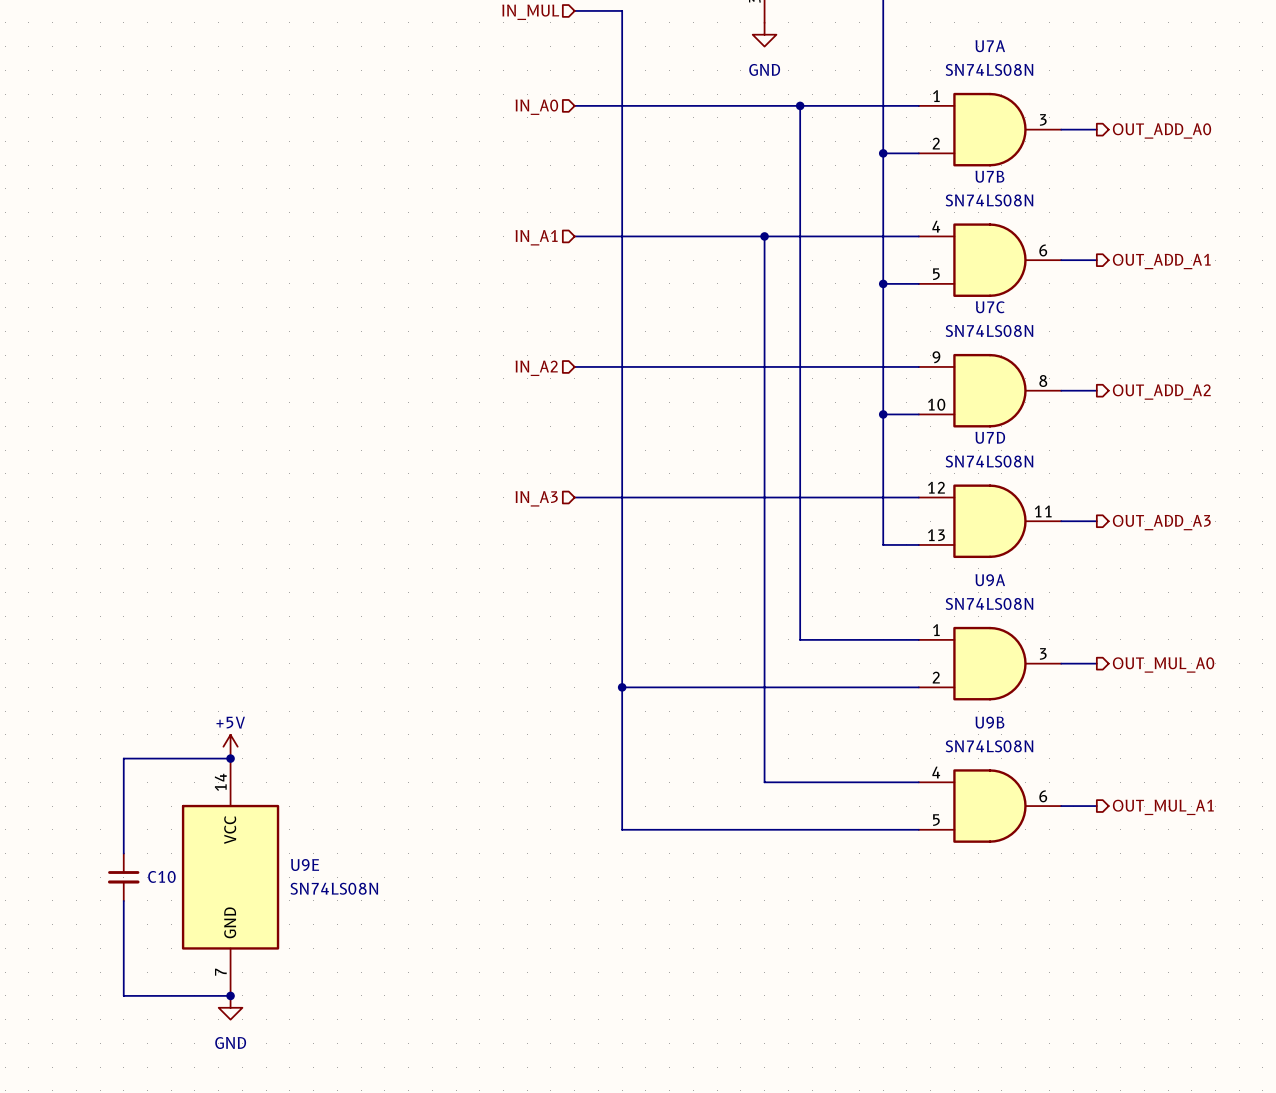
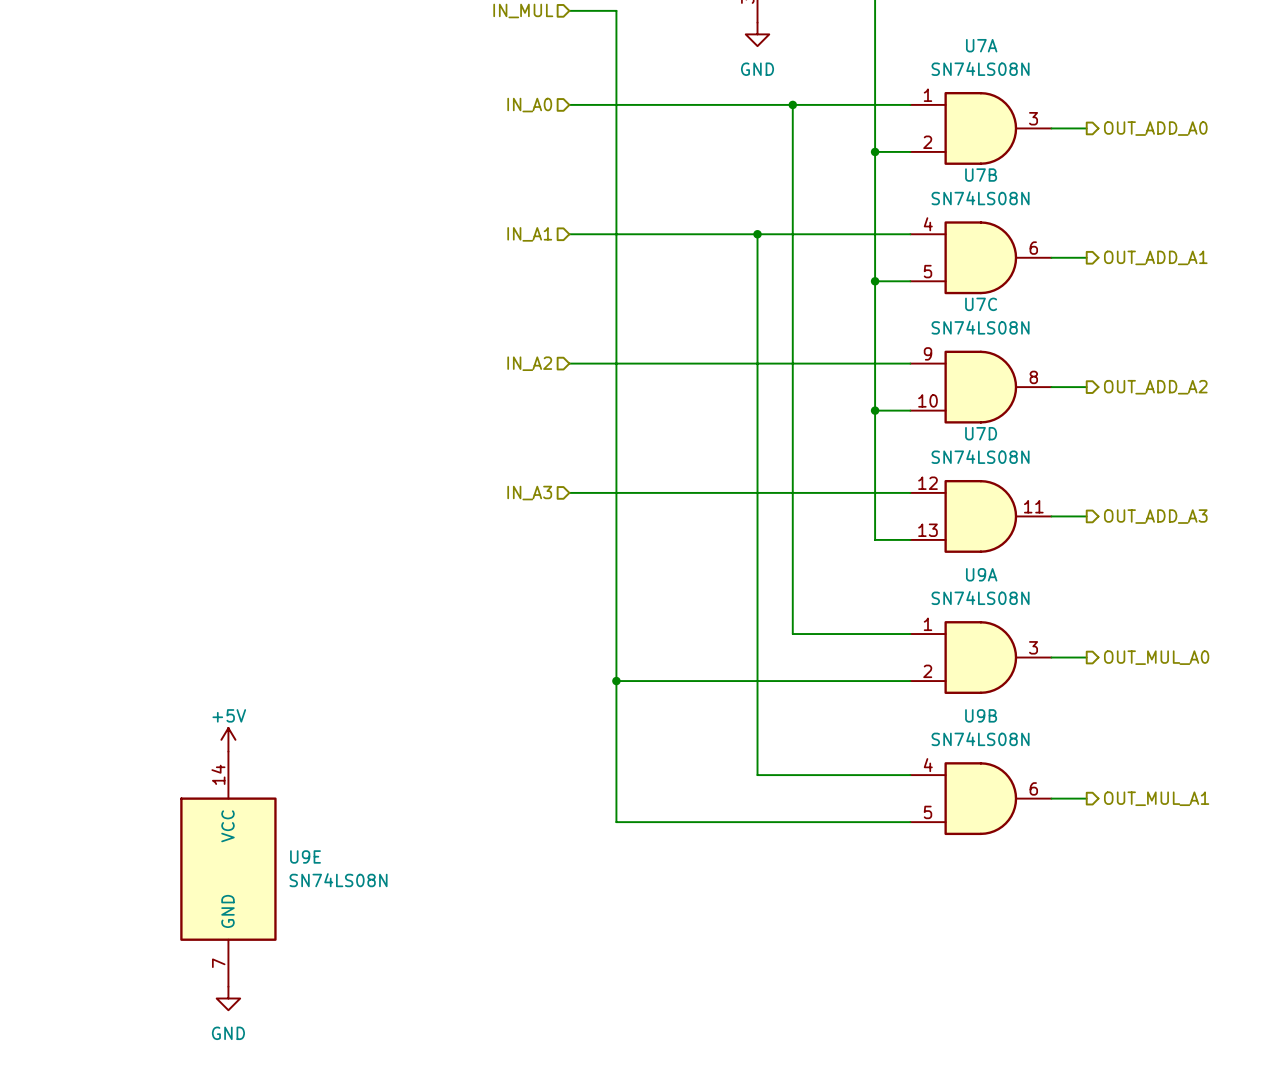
wire: (230, 758) (123, 758) (123, 853) -> none
junction: (230, 758) -> none
C10: (123, 877) -> none
wire: (123, 900) (123, 995) (230, 995) -> none
junction: (230, 995) -> none

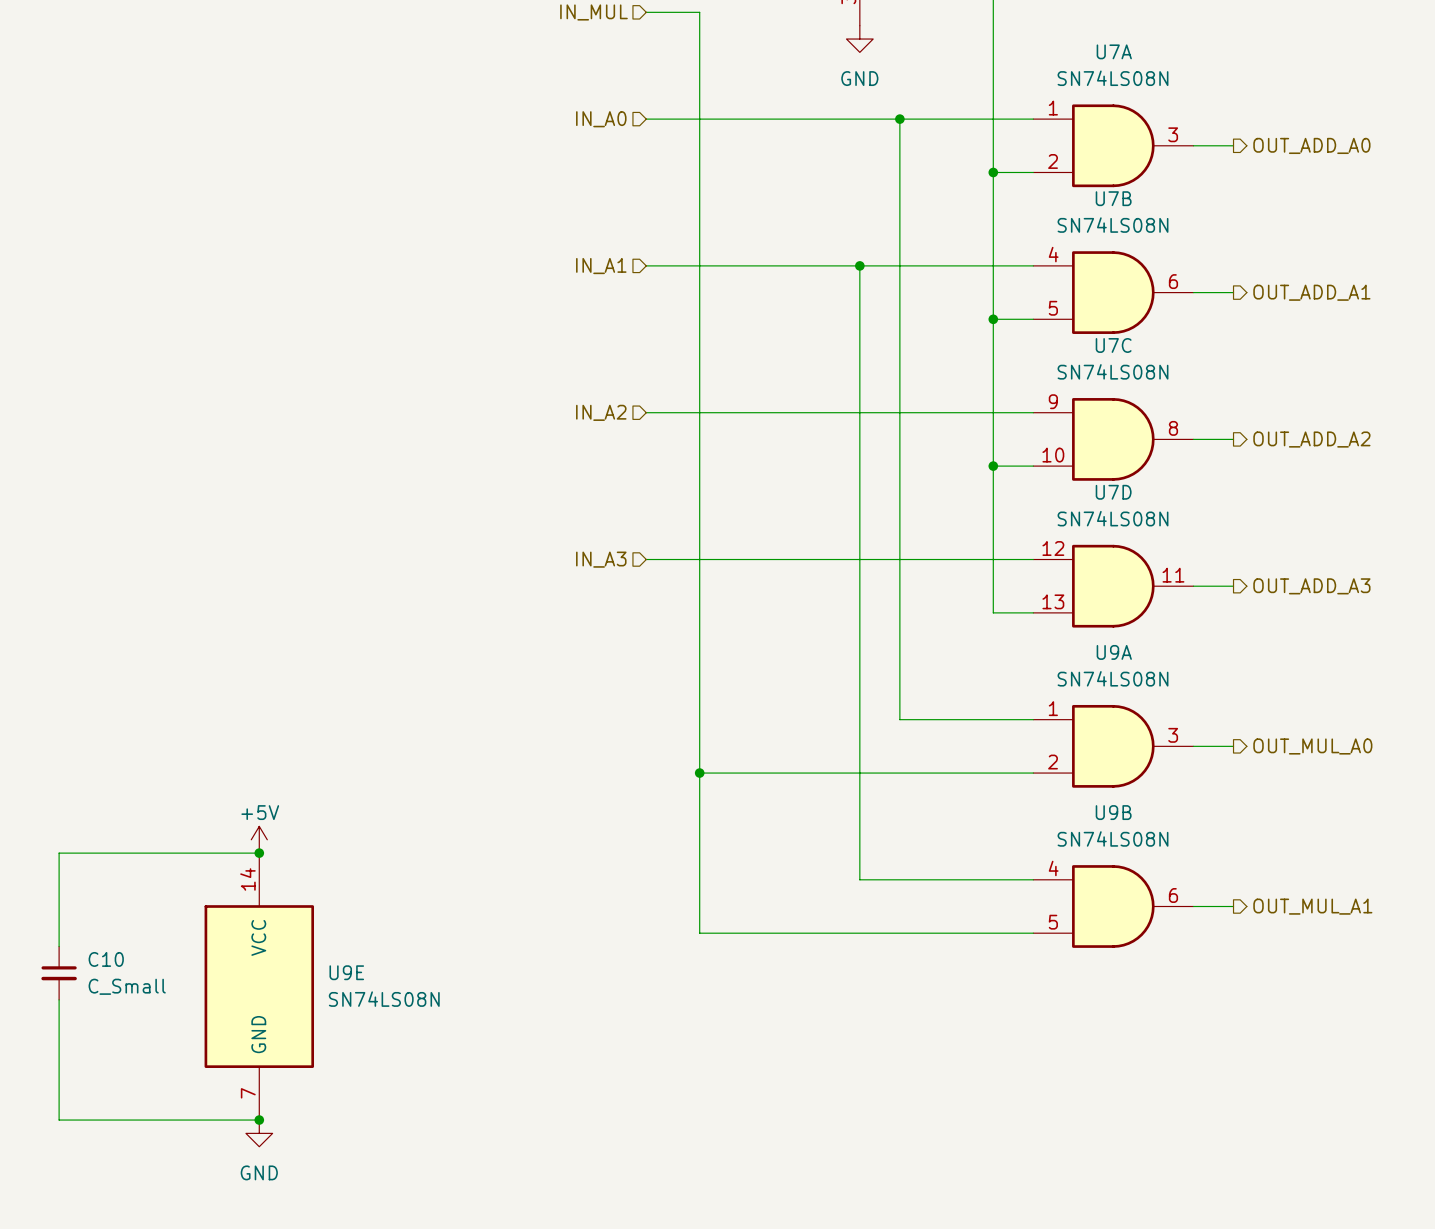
wire: none -> (259, 853) (59, 853) (59, 946)
junction: none -> (259, 853)
C10: none -> C_Small (59, 973)
wire: none -> (59, 999) (59, 1120) (259, 1120)
junction: none -> (259, 1120)

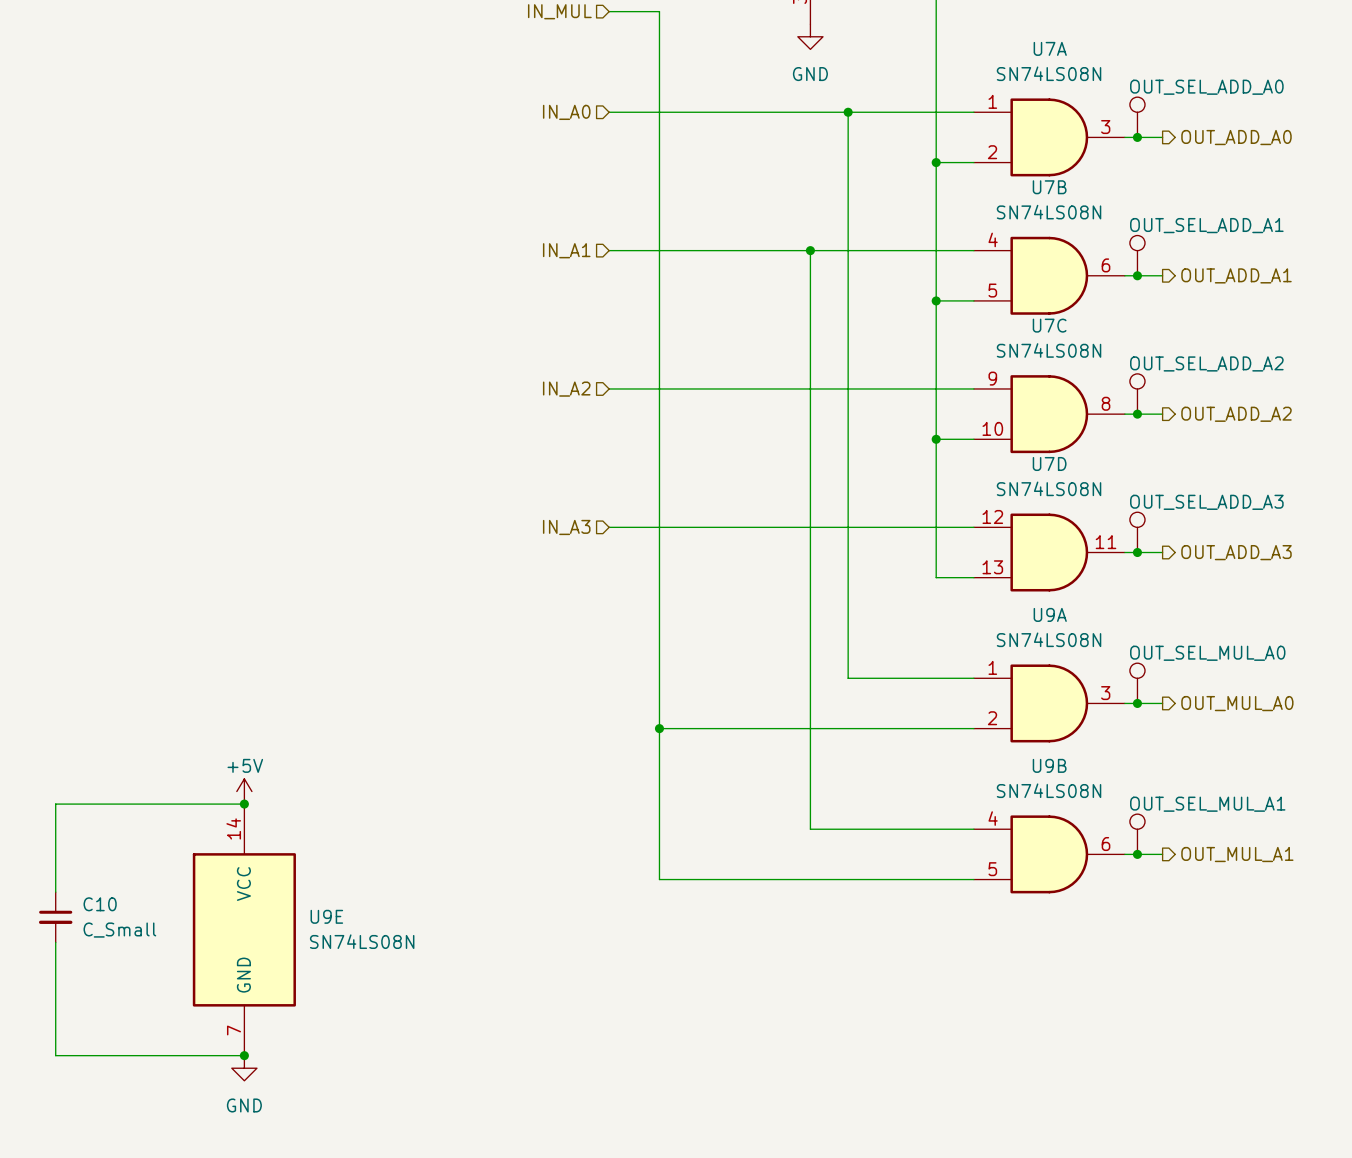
OUT_SEL_ADD_A0: none -> (1137, 117)
junction: none -> (1137, 137)
OUT_SEL_ADD_A1: none -> (1137, 255)
junction: none -> (1137, 275)
OUT_SEL_ADD_A2: none -> (1137, 394)
junction: none -> (1137, 414)
OUT_SEL_ADD_A3: none -> (1137, 532)
junction: none -> (1137, 552)
OUT_SEL_MUL_A0: none -> (1137, 683)
junction: none -> (1137, 703)
OUT_SEL_MUL_A1: none -> (1137, 834)
junction: none -> (1137, 854)

